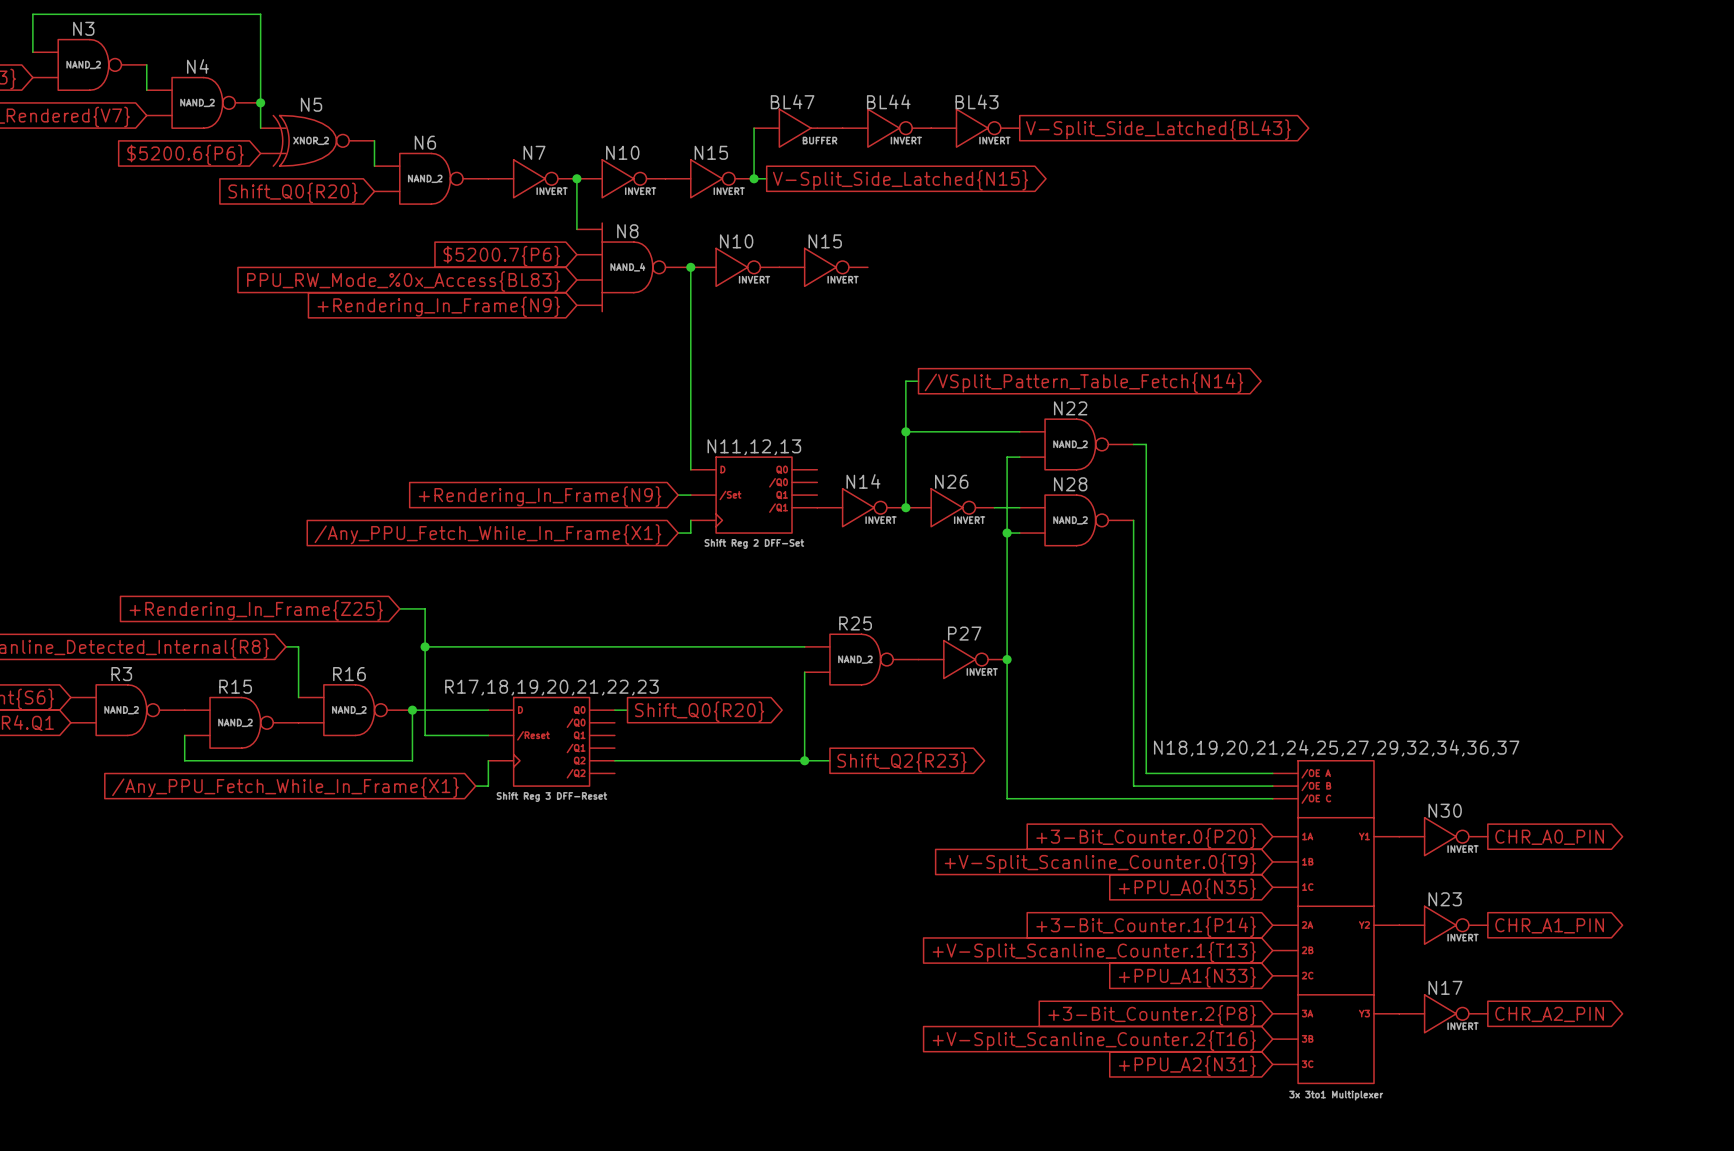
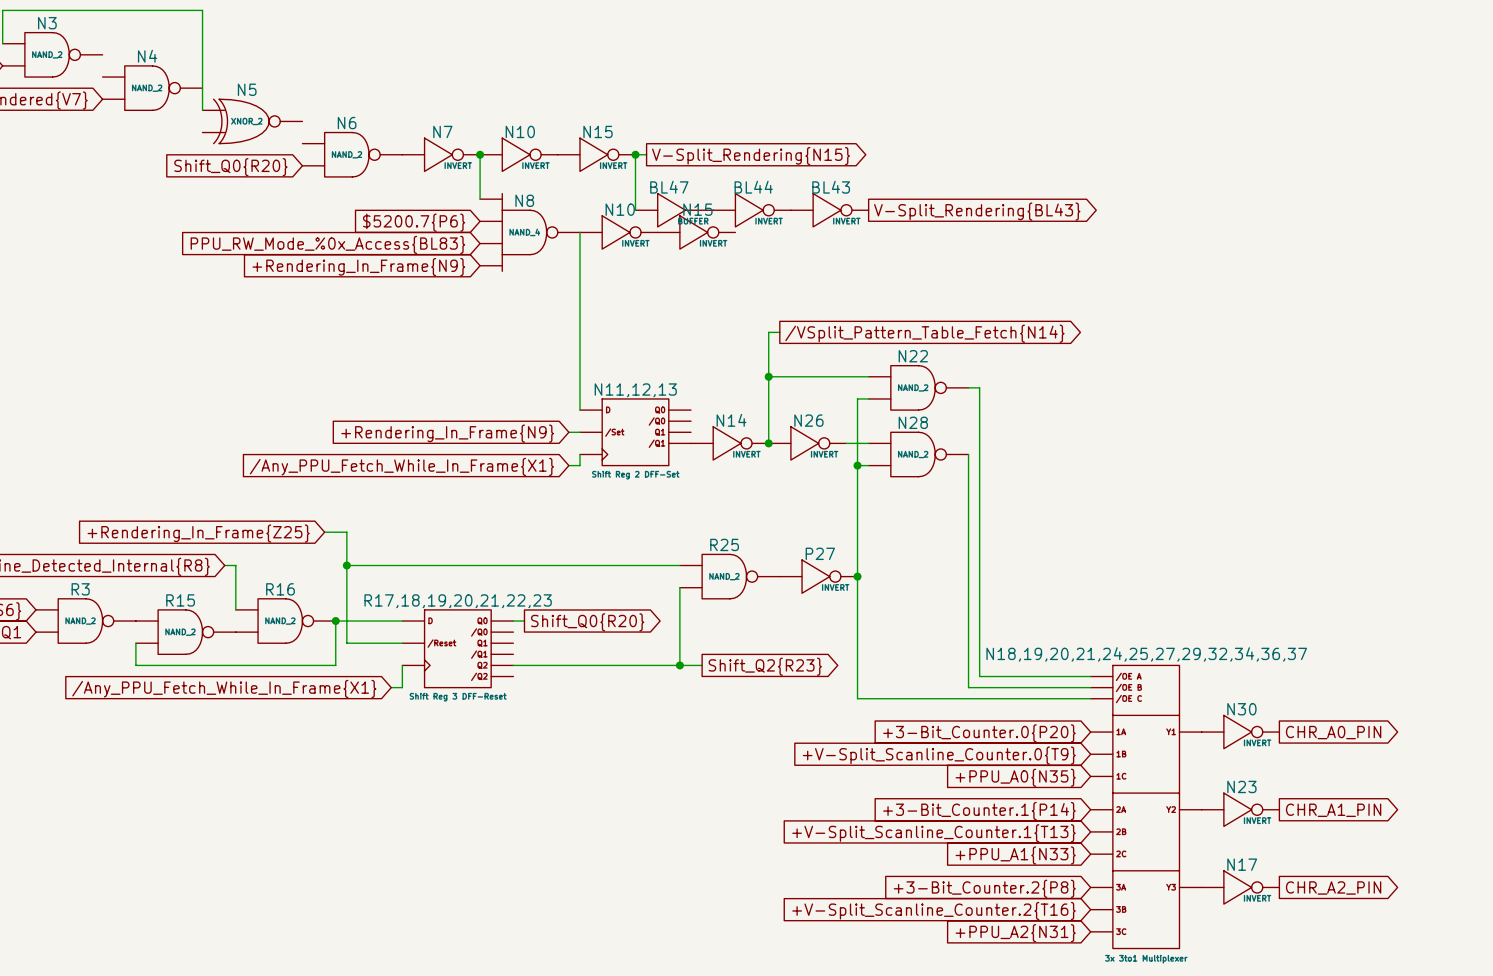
wire: (146, 64) (146, 90) -> none
junction: (260, 102) -> none
wire: (754, 128) (754, 178) -> (635, 210) (635, 154)
BL47 position: (798, 128) -> (674, 210)
BL44 position: (886, 128) -> (752, 210)
BL43 position: (975, 128) -> (829, 210)
global label: V-Split_Side_Latched{BL43} (1158, 129) -> none
wire: (374, 140) (374, 166) -> none
global label: $5200.6{P6} (185, 154) -> none
global label: V-Split_Side_Latched{N15} (900, 180) -> V-Split_Rendering{N15} (751, 156)
global label: none -> V-Split_Rendering{BL43} (977, 211)
junction: (690, 267) -> none

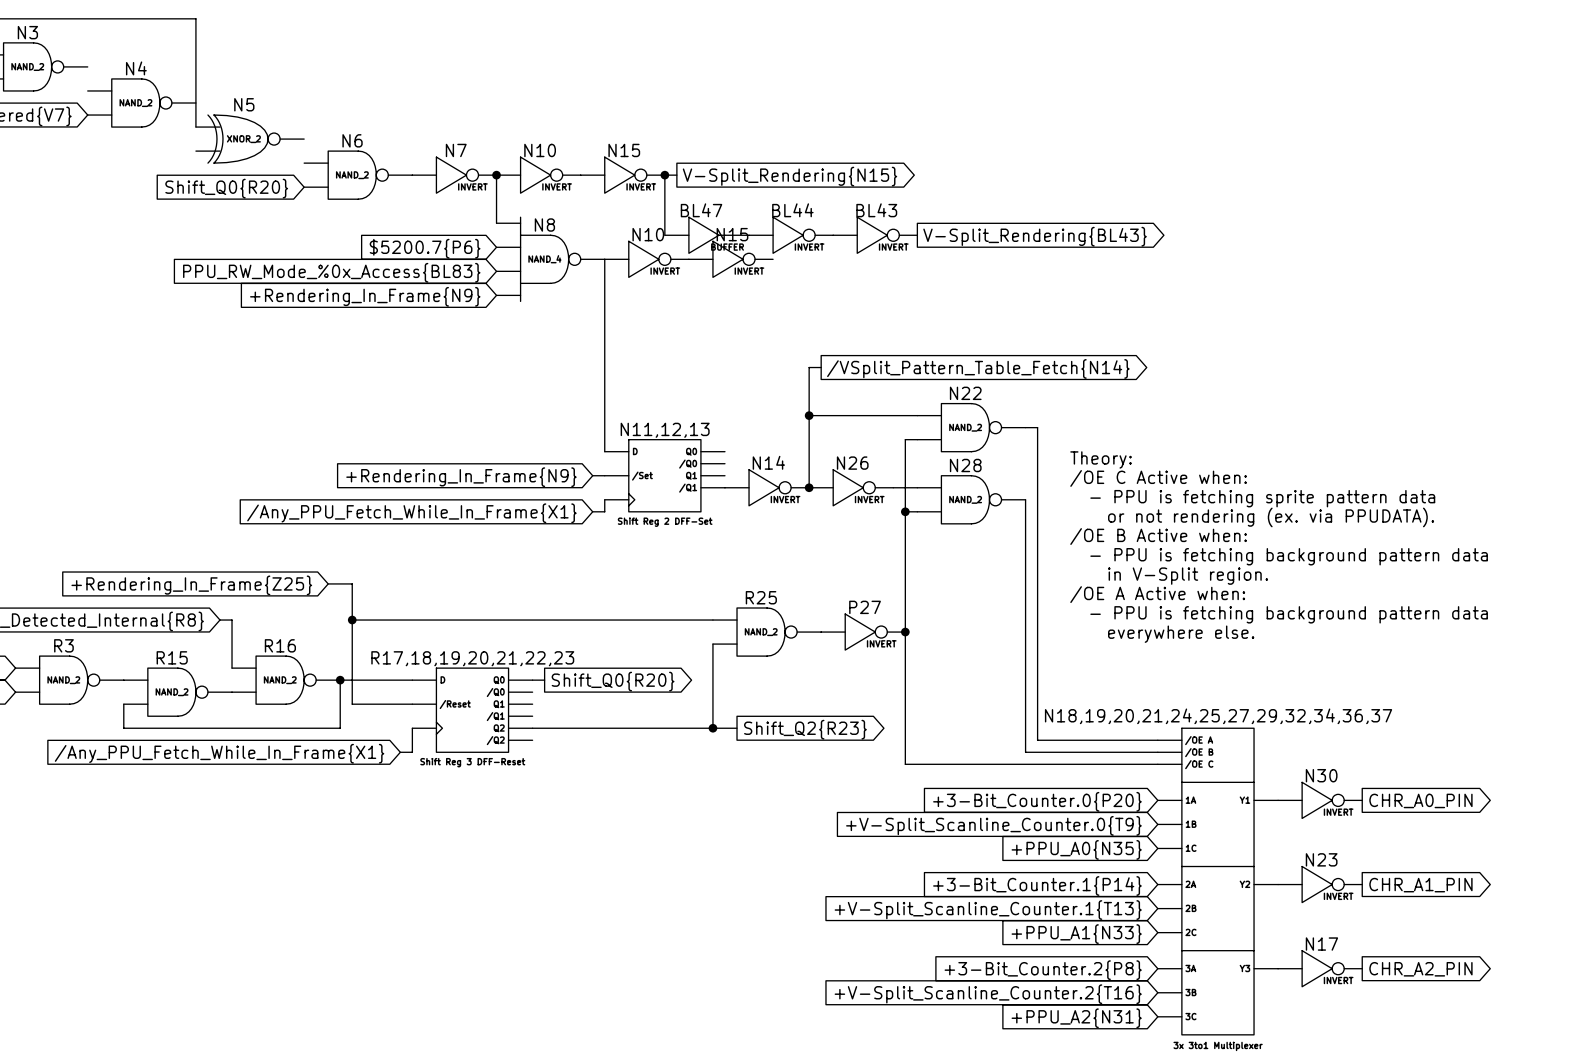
text: none -> Theory: (1101, 459)
text: none -> /OE C Active when: (1158, 478)
text: none -> - PPU is fetching sprite pattern data (1262, 498)
text: none -> or not rendering (ex. via PPUDATA). (1271, 517)
text: none -> /OE B Active when: (1158, 536)
text: none -> - PPU is fetching background pattern data (1289, 556)
text: none -> in V-Split region. (1188, 576)
text: none -> /OE A Active when: (1157, 594)
text: none -> - PPU is fetching background pattern data (1289, 614)
text: none -> everywhere else. (1181, 634)

